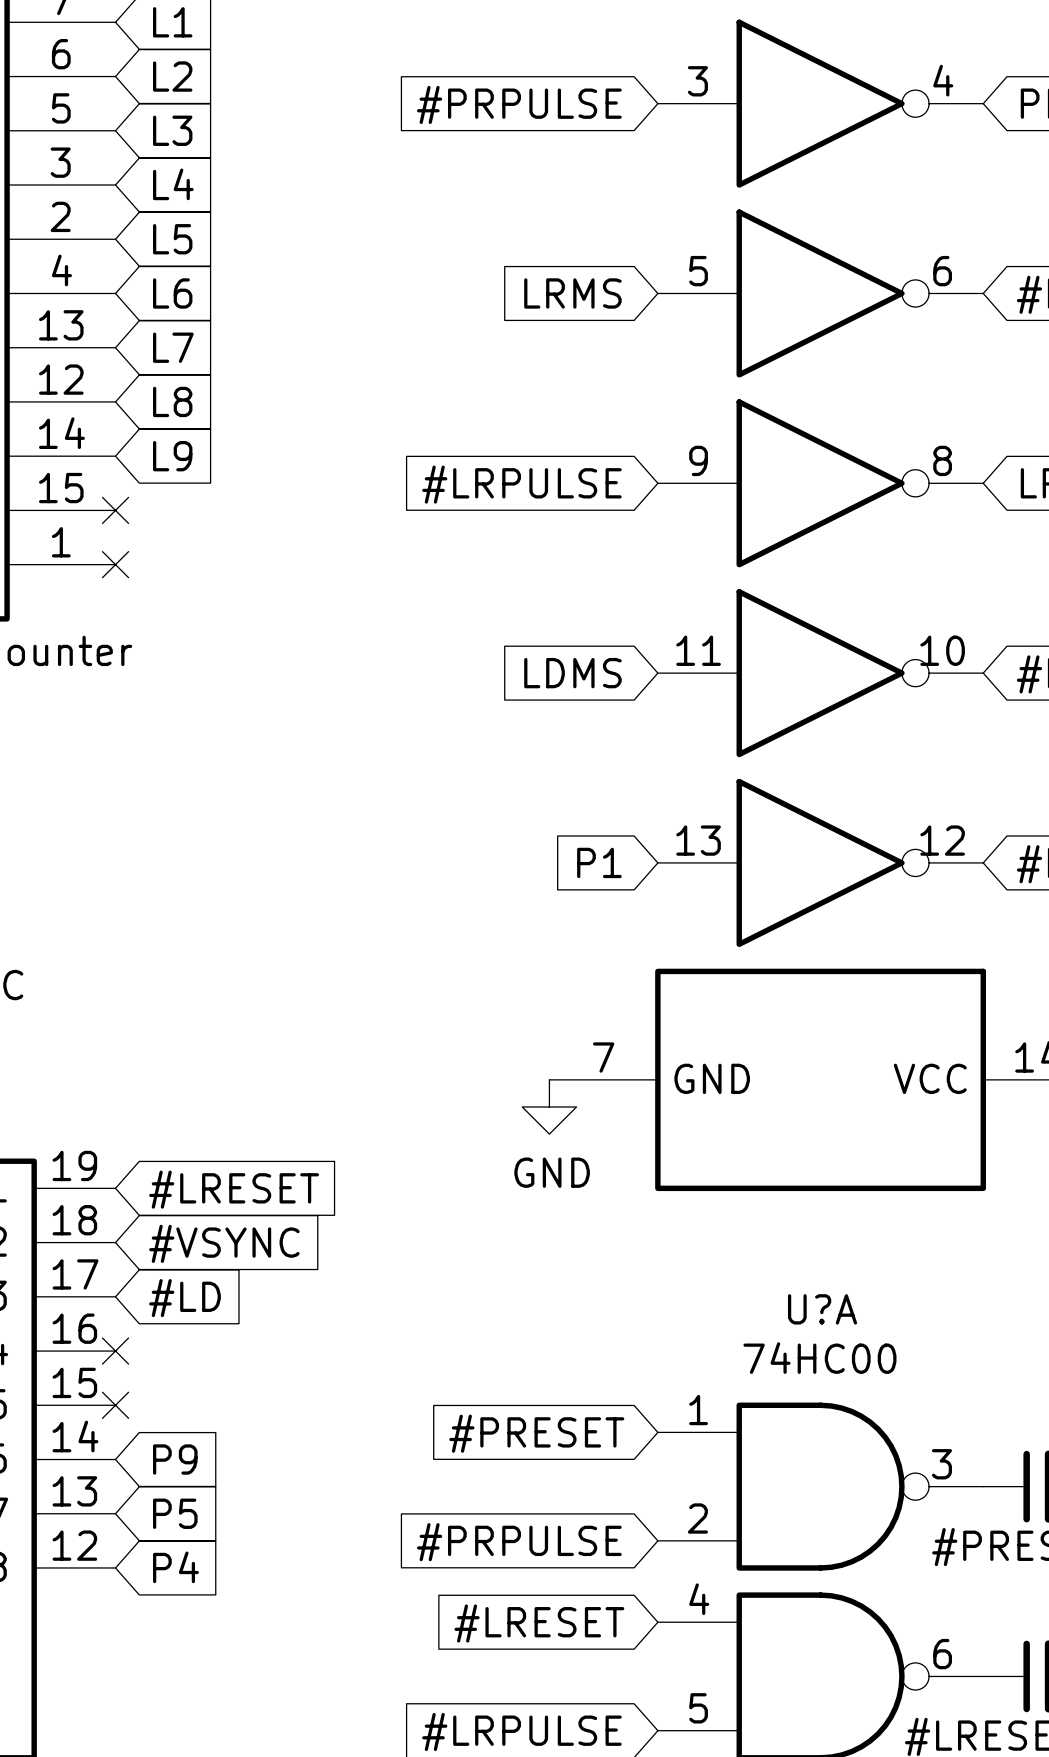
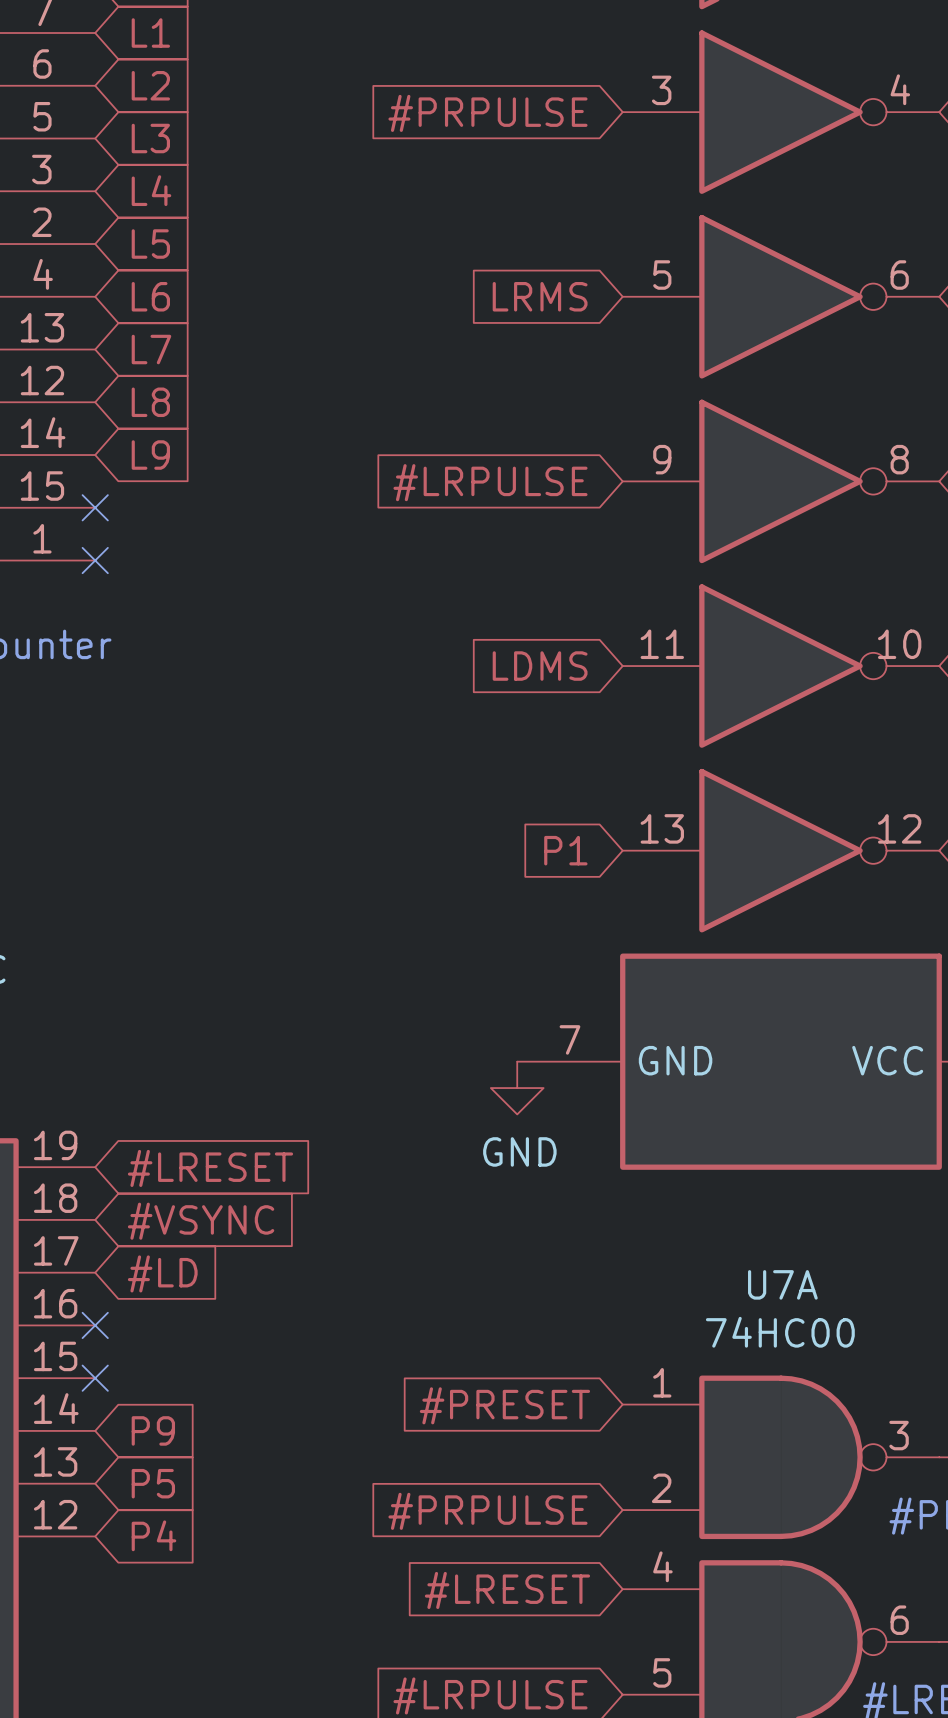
U?A name: U?A (822, 1309) -> U7A (782, 1284)

